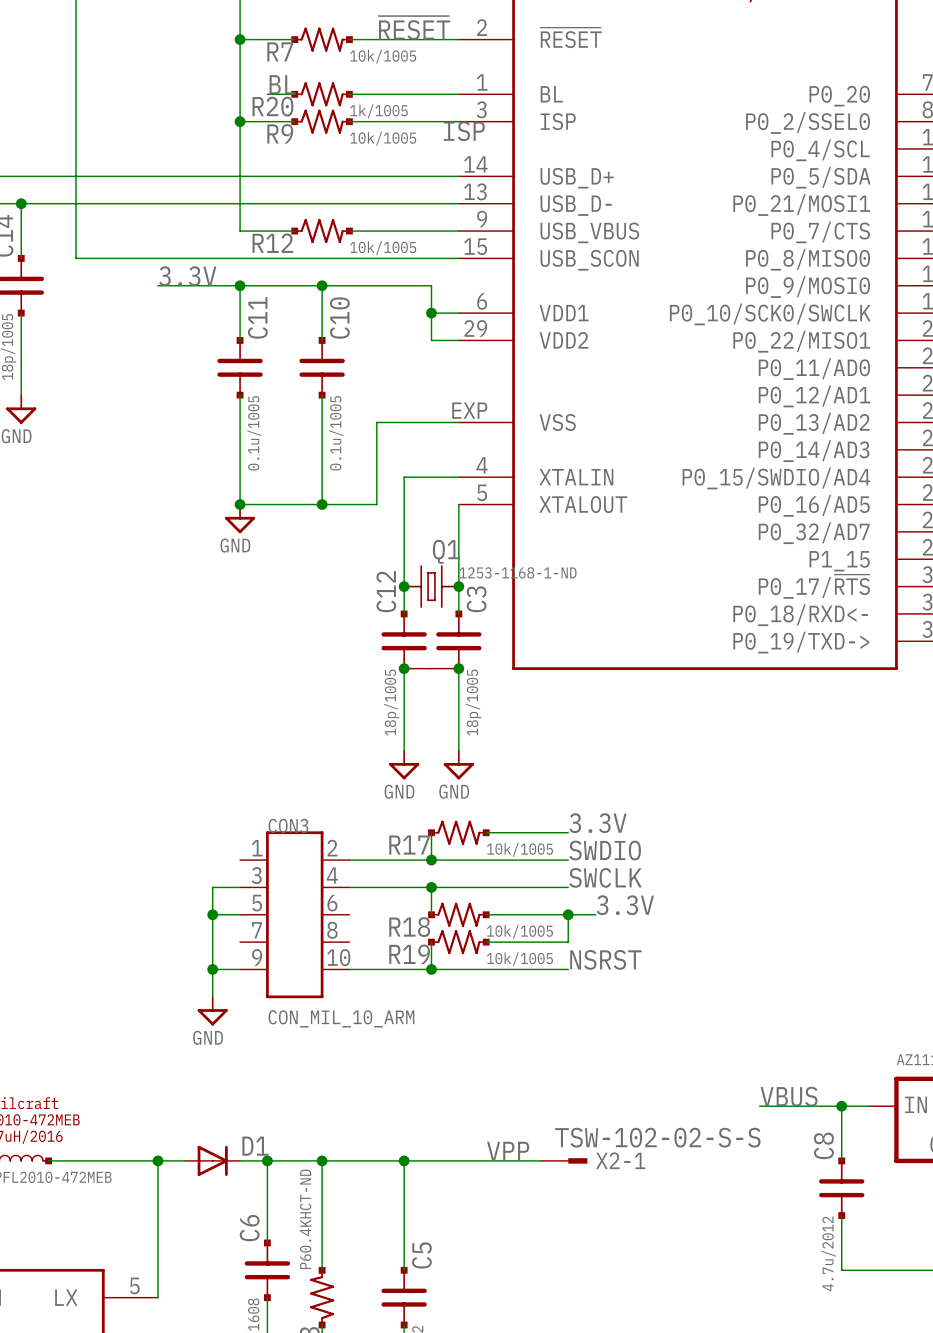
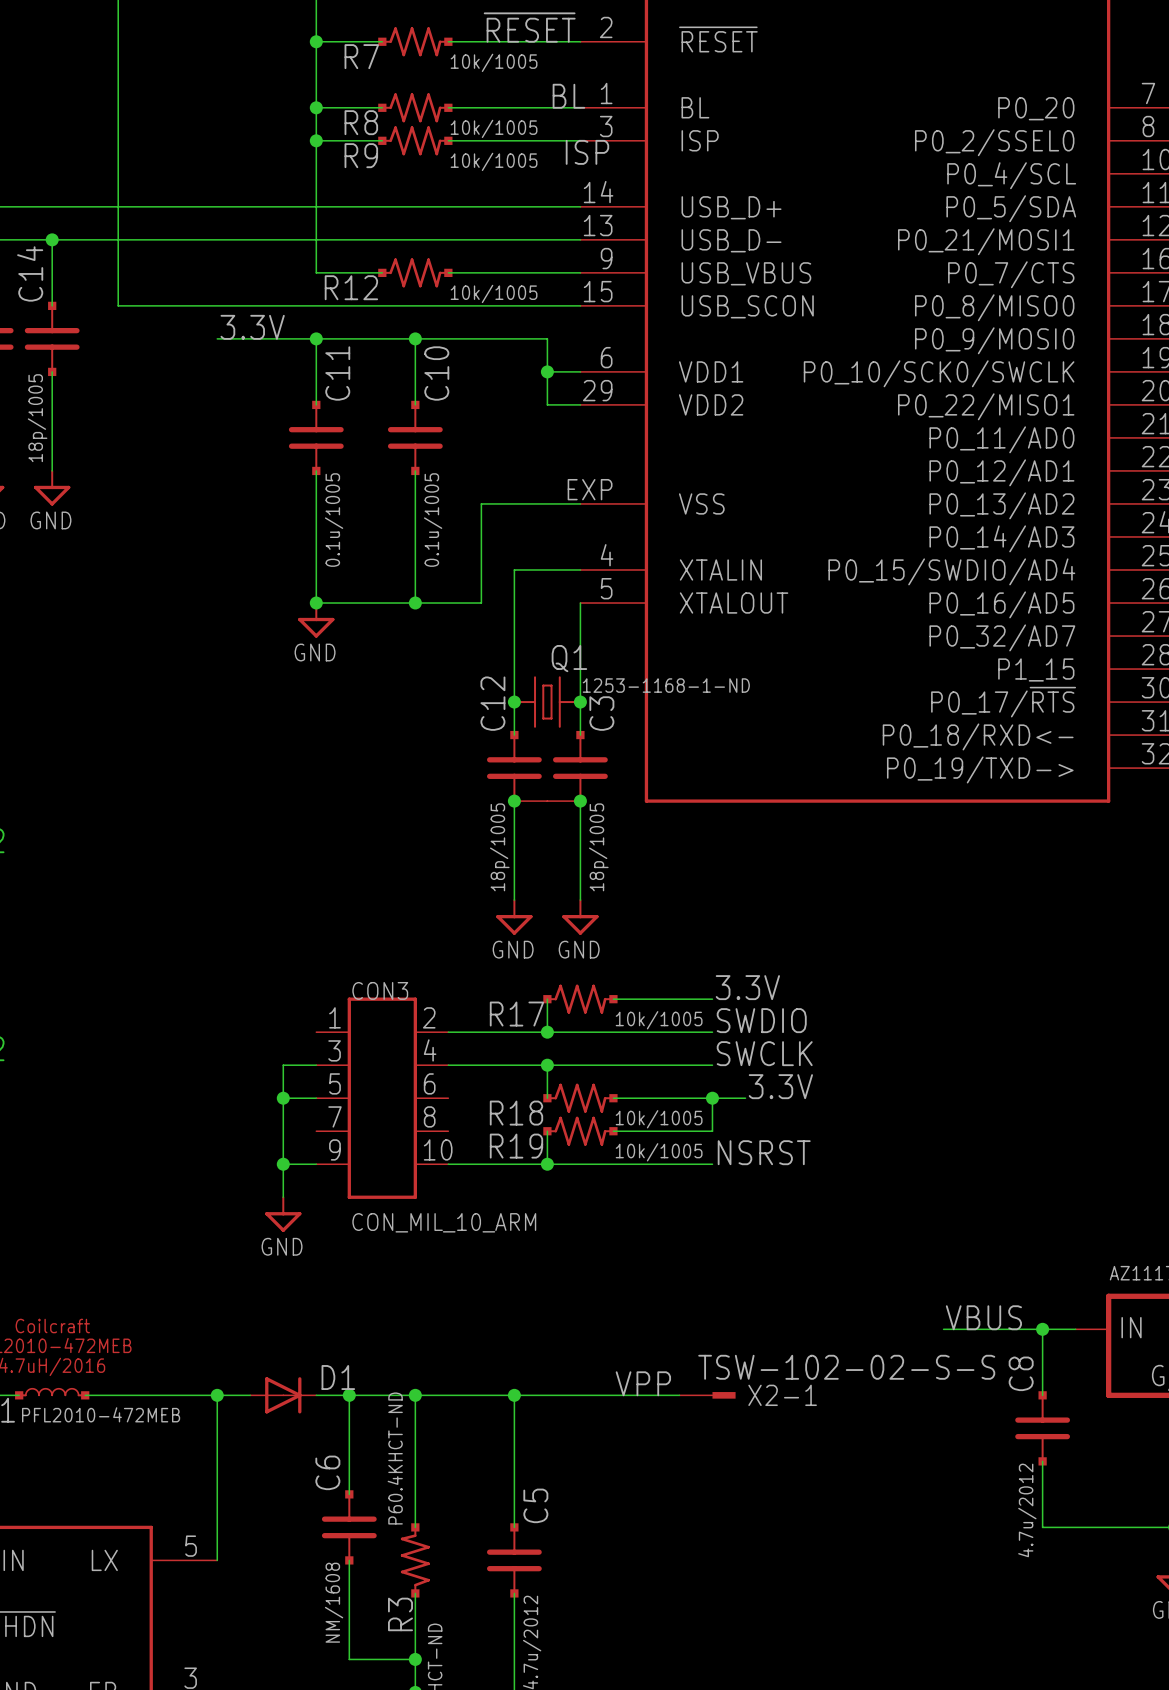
label position: BL (282, 84) -> BL (568, 96)
wire: none -> (316, 107) (349, 107)
junction: none -> (316, 107)
R20 name: R20 (272, 106) -> R8 (361, 122)
R20 value: 1k/1005 (378, 111) -> 10k/1005 (494, 128)

